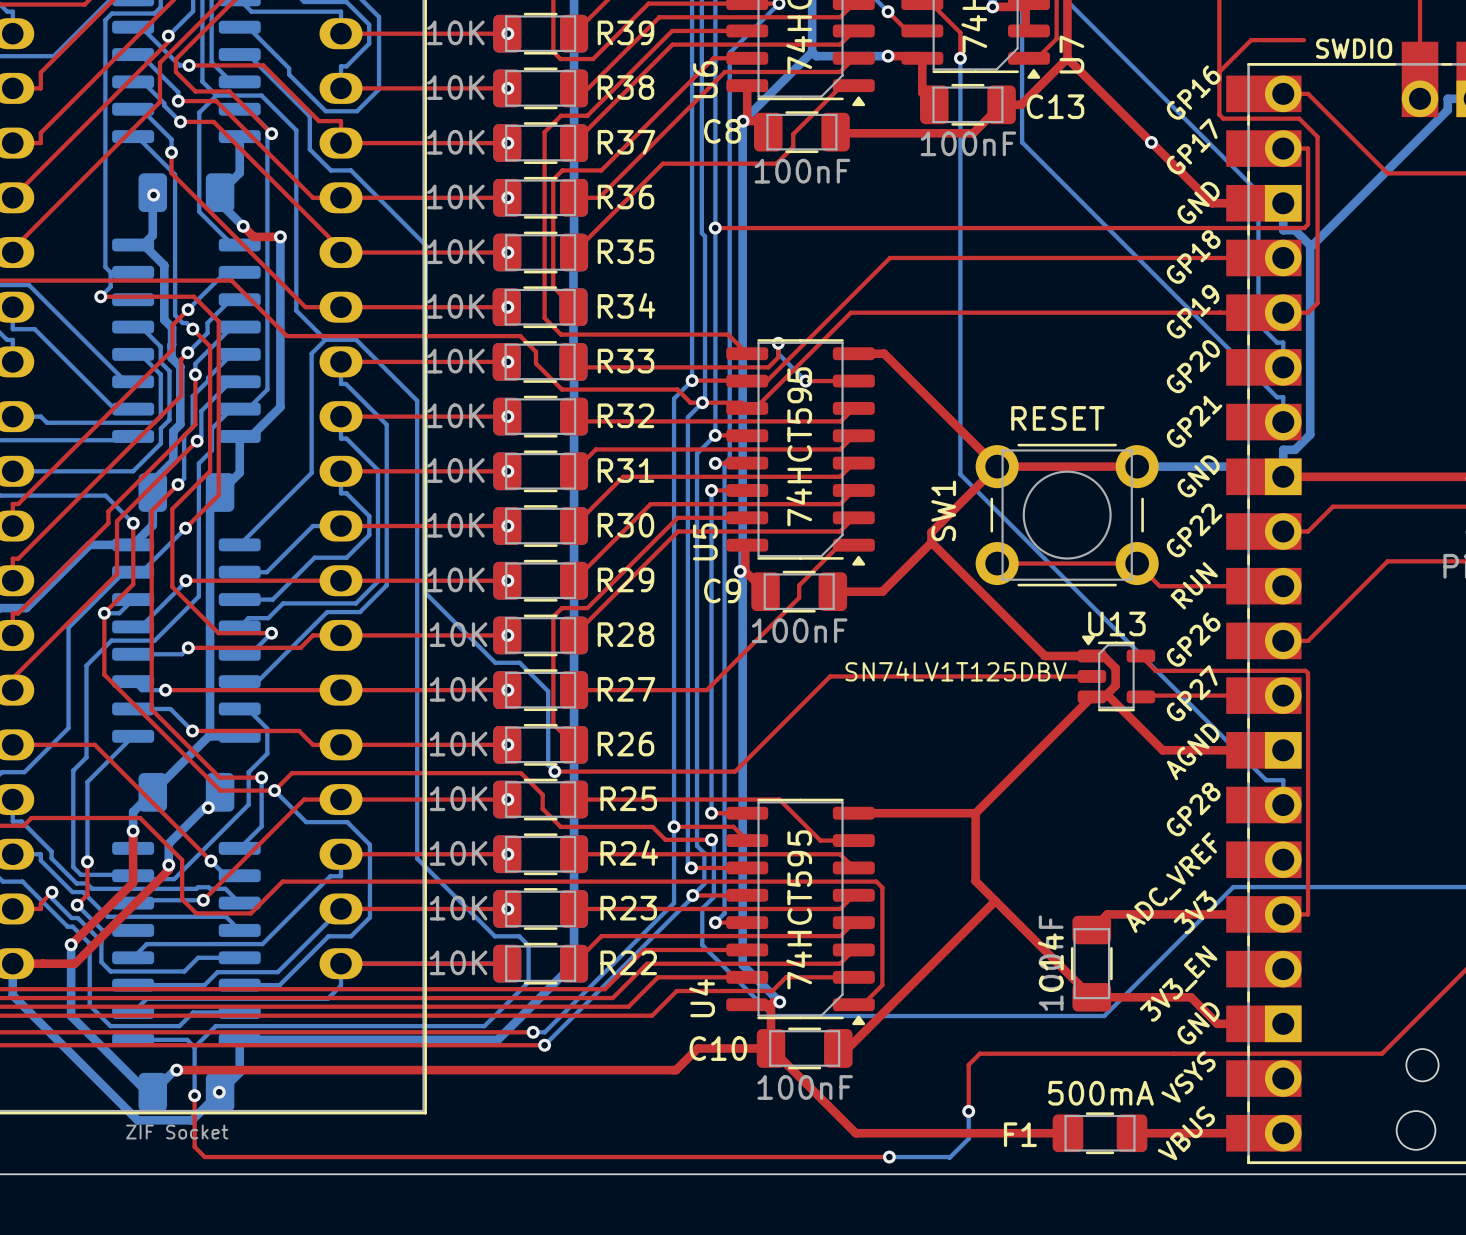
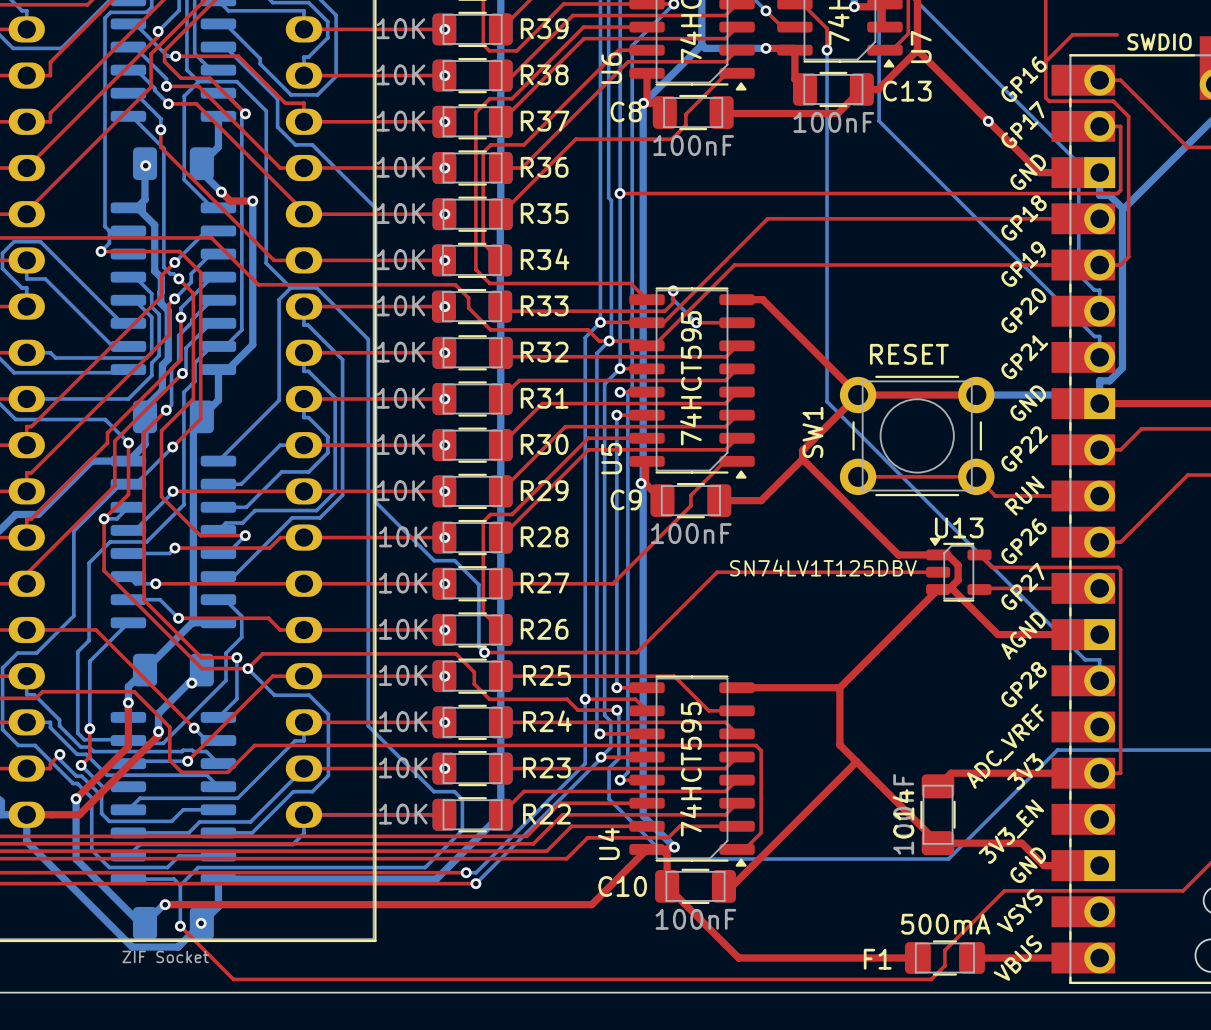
top track: (771, 1048) (697, 1048) (676, 1070) -> (647, 849) (591, 904) (586, 904)
top track: (1170, 1053) (979, 1053) (968, 1064) (968, 1111) -> none
top track: (194, 1095) (194, 1146) (204, 1157) (889, 1157) -> (180, 926) (233, 979) (931, 979) (944, 965) (944, 950) (1004, 890)
bottom track: (968, 1111) (968, 1138) (949, 1157) (889, 1157) -> none
via: (968, 1111) -> none
via: (889, 1157) -> none

